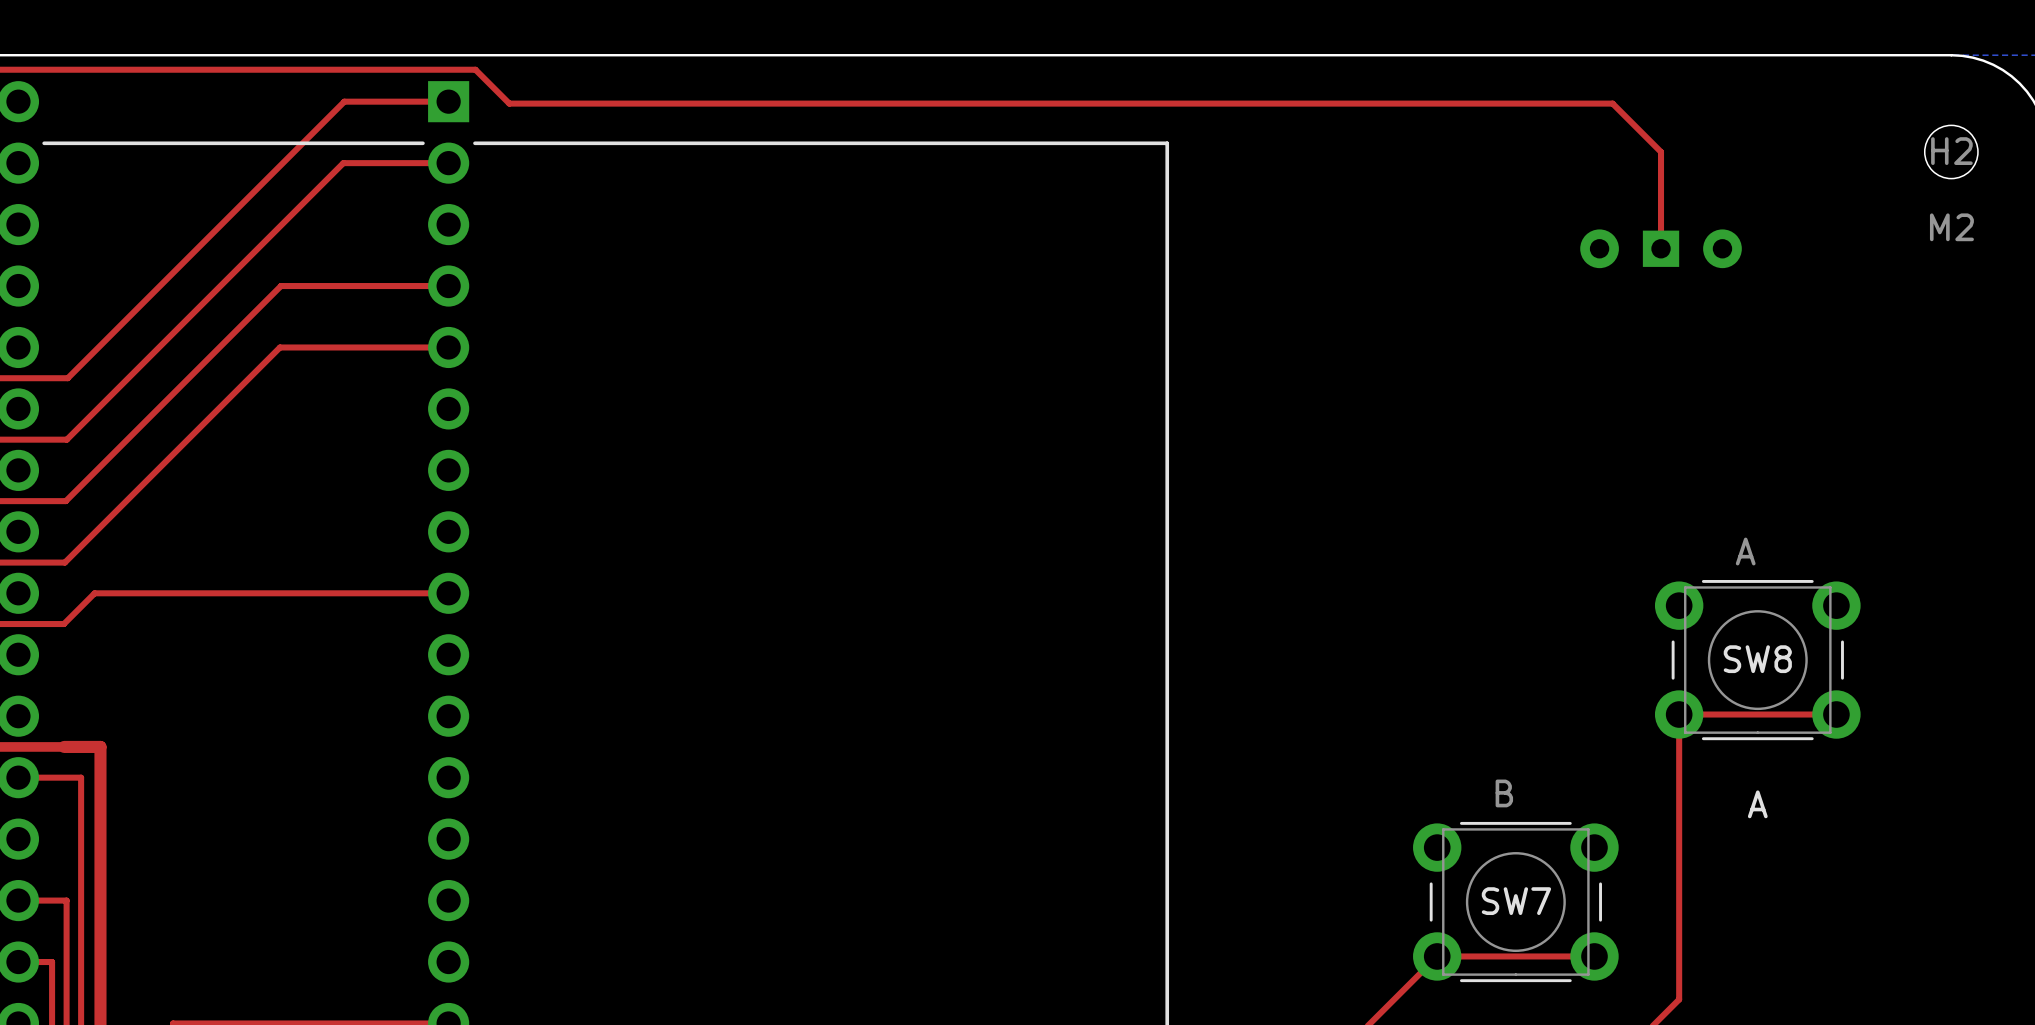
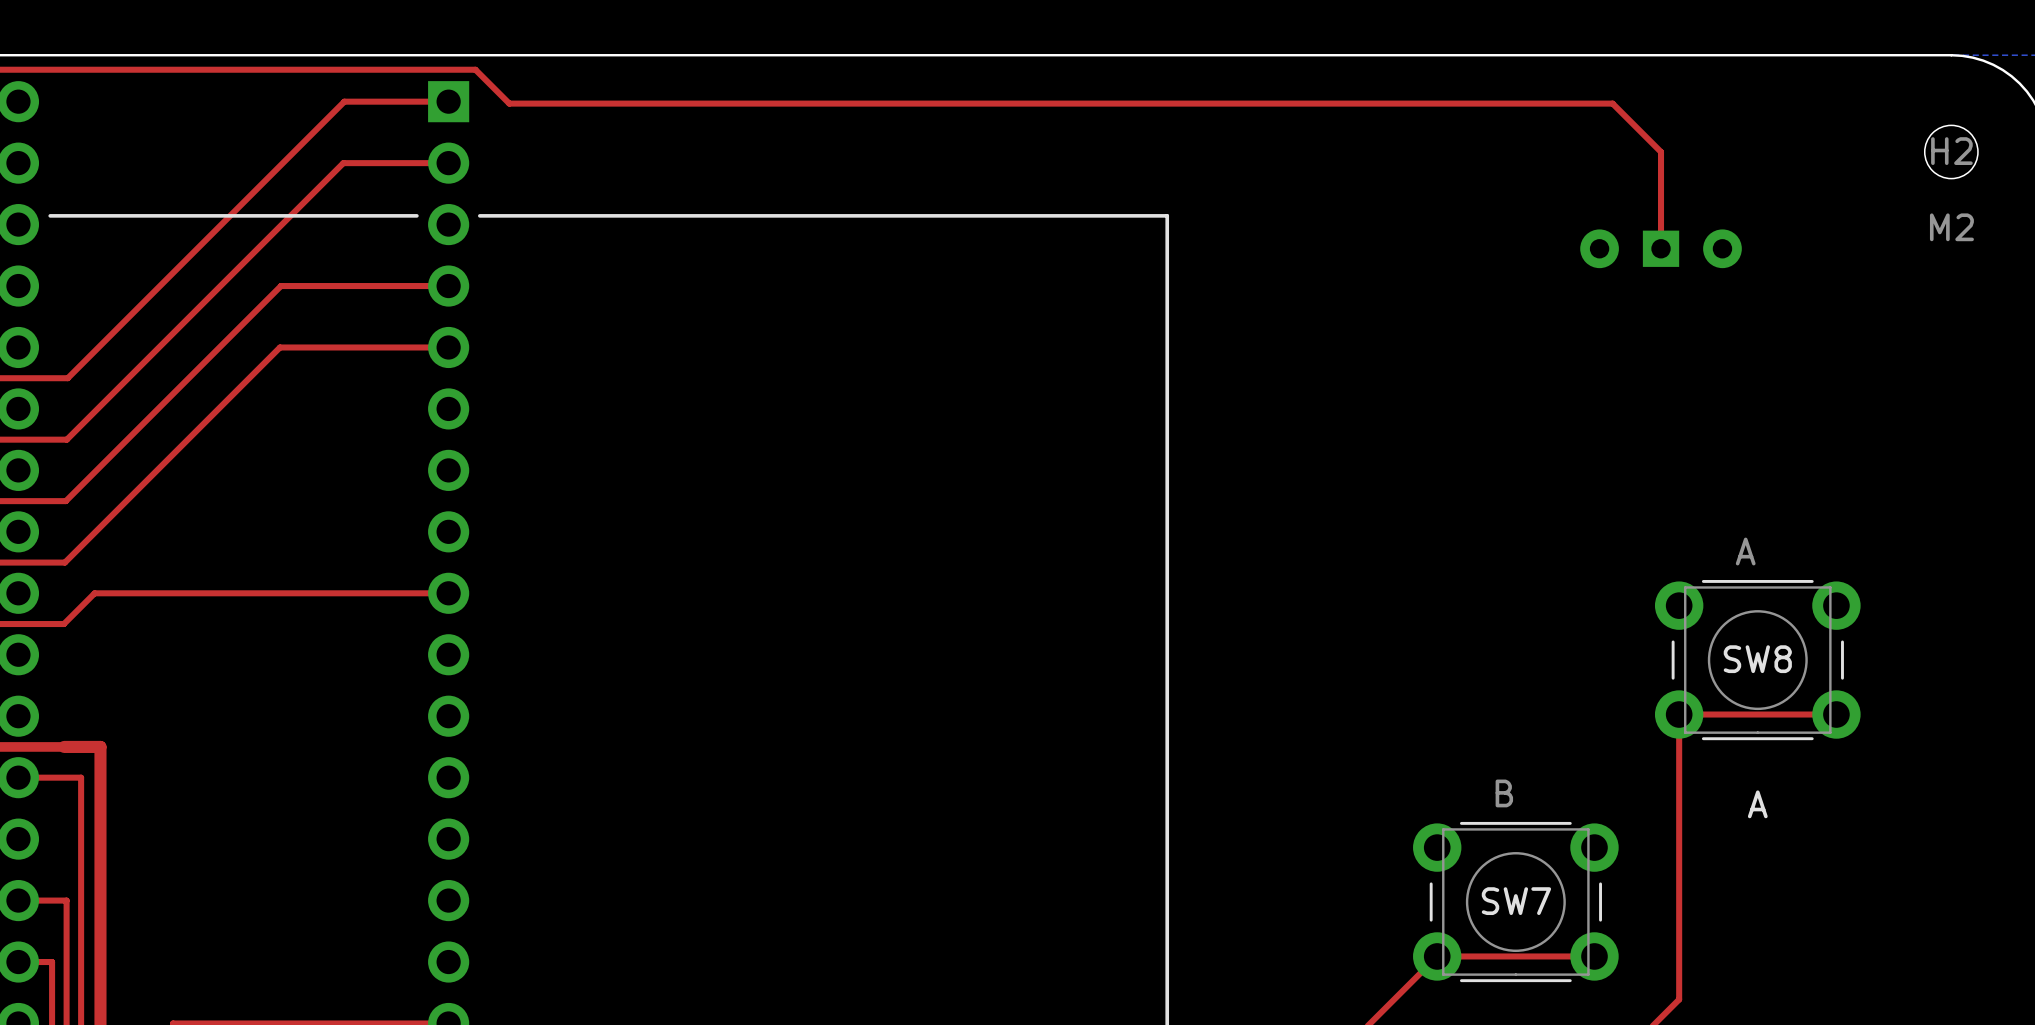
line: (44, 143) (422, 143) -> none
line: (474, 143) (1167, 143) (1167, 215) -> (479, 215) (1167, 215)
line: none -> (50, 215) (416, 215)

